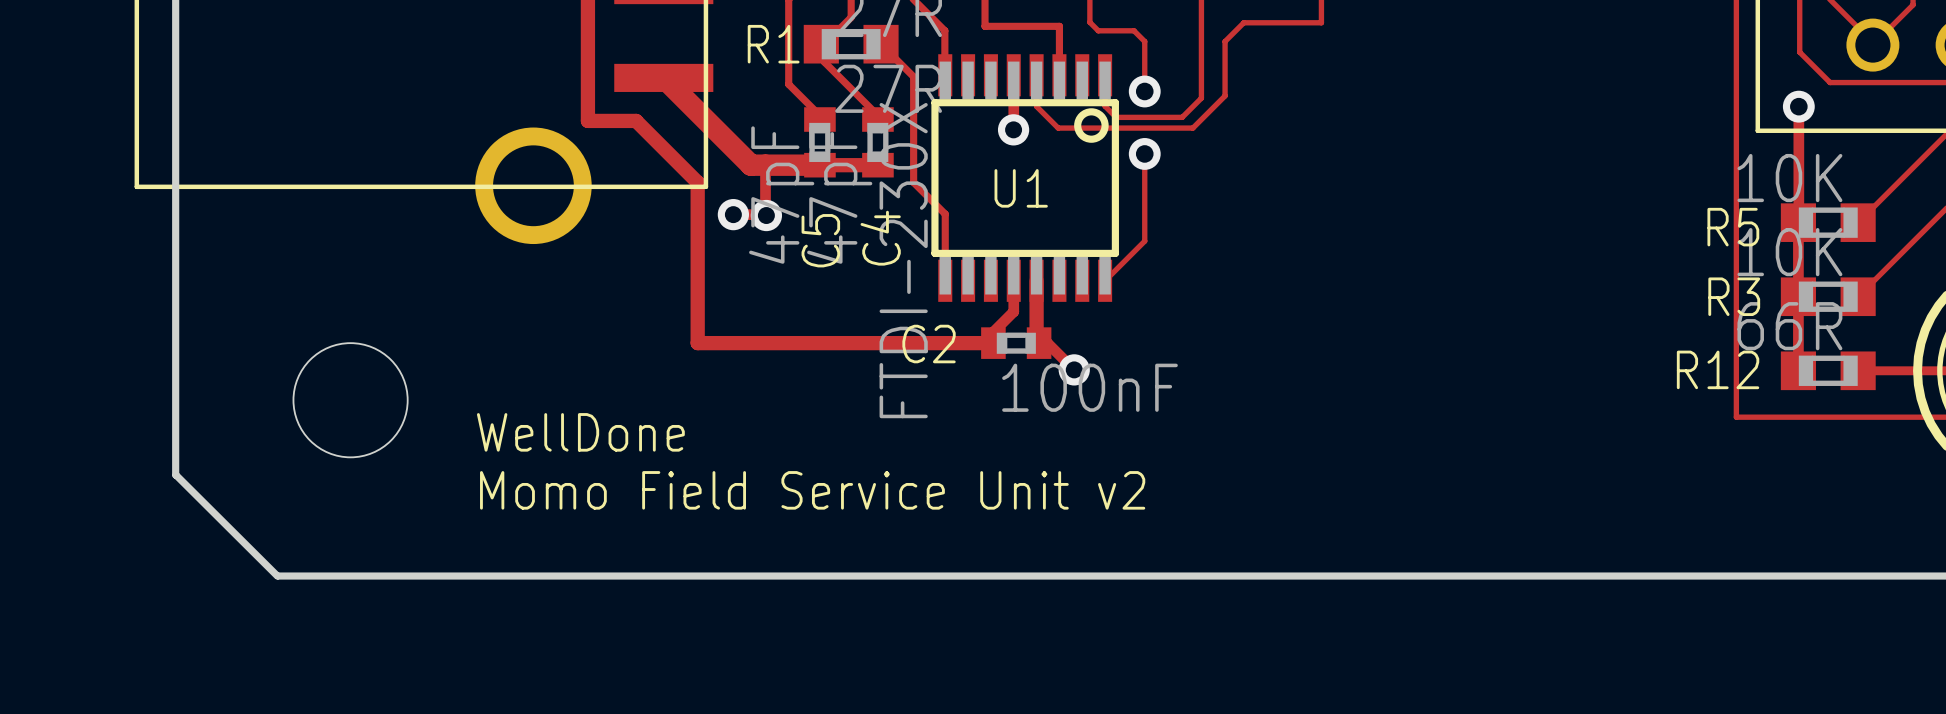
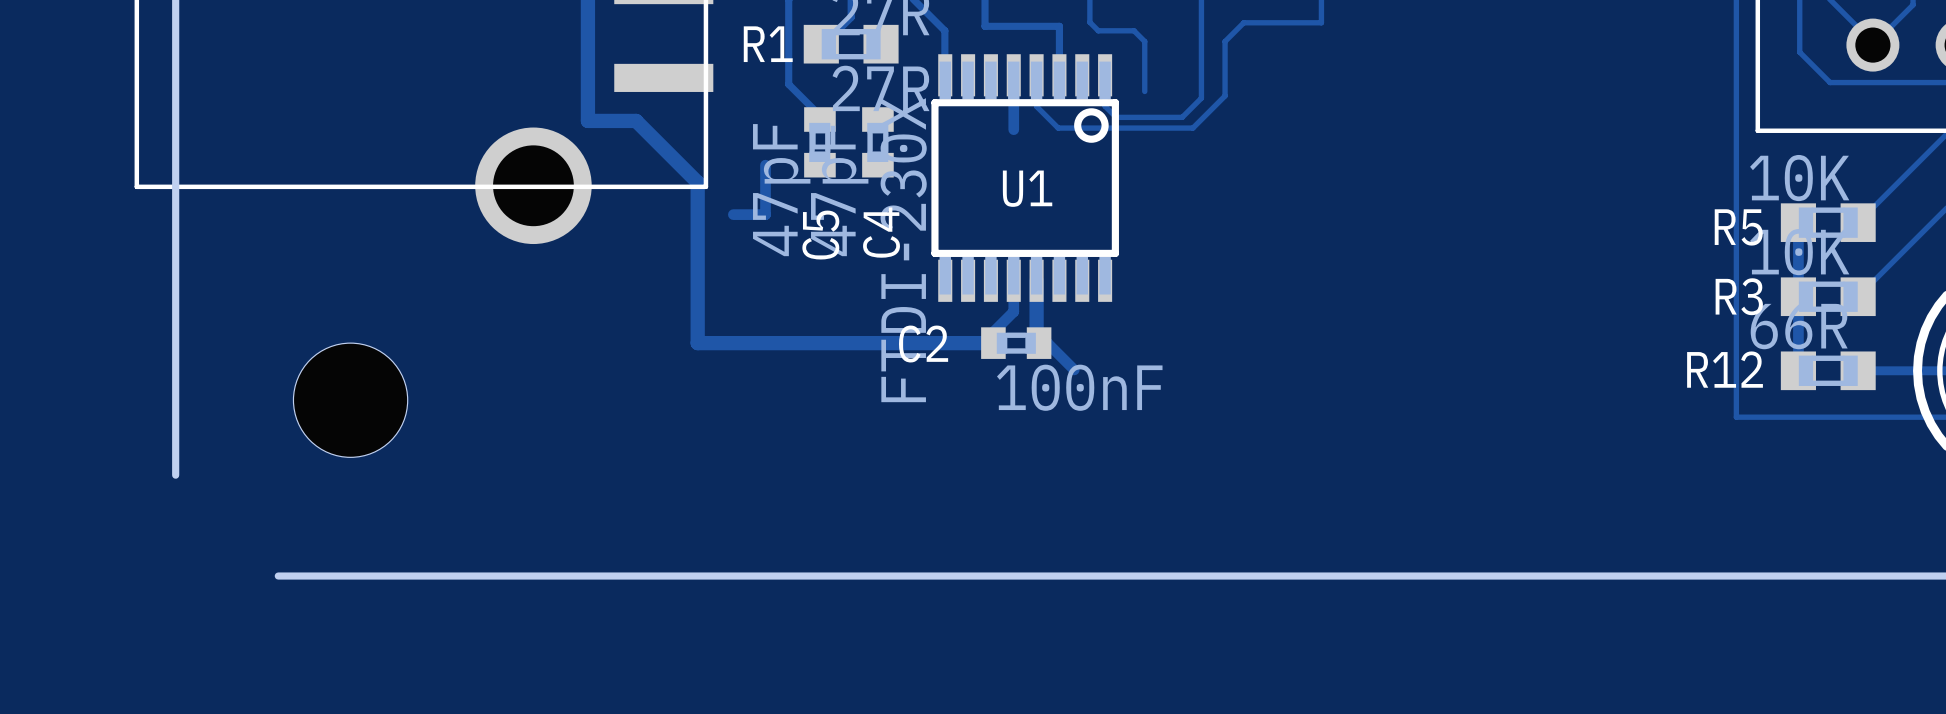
track: (821, 44) (824, 44) (824, 62) (877, 115) (877, 119) -> none
track: (881, 44) (913, 76) (913, 182) (945, 214) (945, 280) -> none
track: (663, 77) (751, 165) (877, 165) -> none
via: (1144, 91) -> none
track: (1798, 106) (1798, 222) -> none
via: (1798, 106) -> none
via: (1013, 129) -> none
track: (1144, 153) (1144, 241) (1105, 280) -> none
via: (1144, 153) -> none
via: (733, 214) -> none
via: (766, 215) -> none
via: (1074, 369) -> none
text: WellDone (580, 432) -> none
board edge: (176, 475) (277, 576) -> none
text: Momo Field Service Unit v2 (812, 490) -> none

